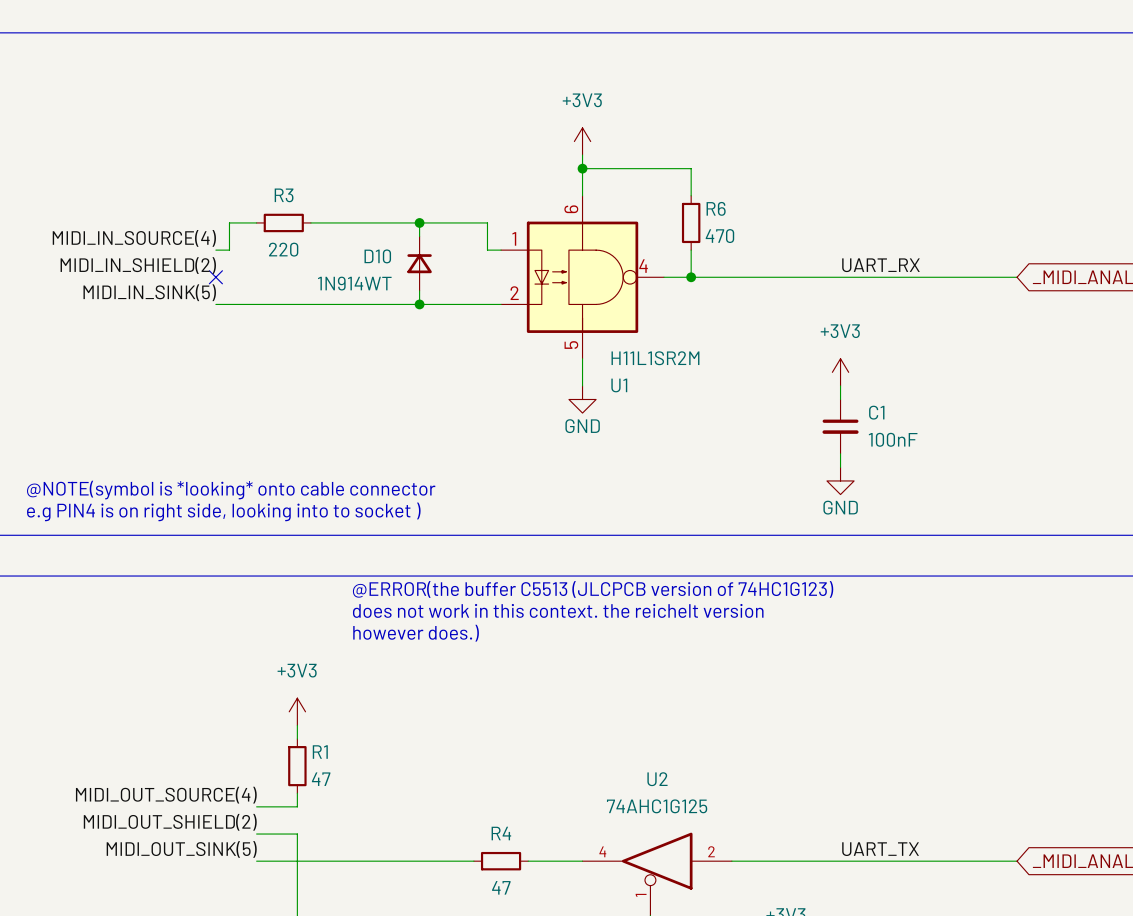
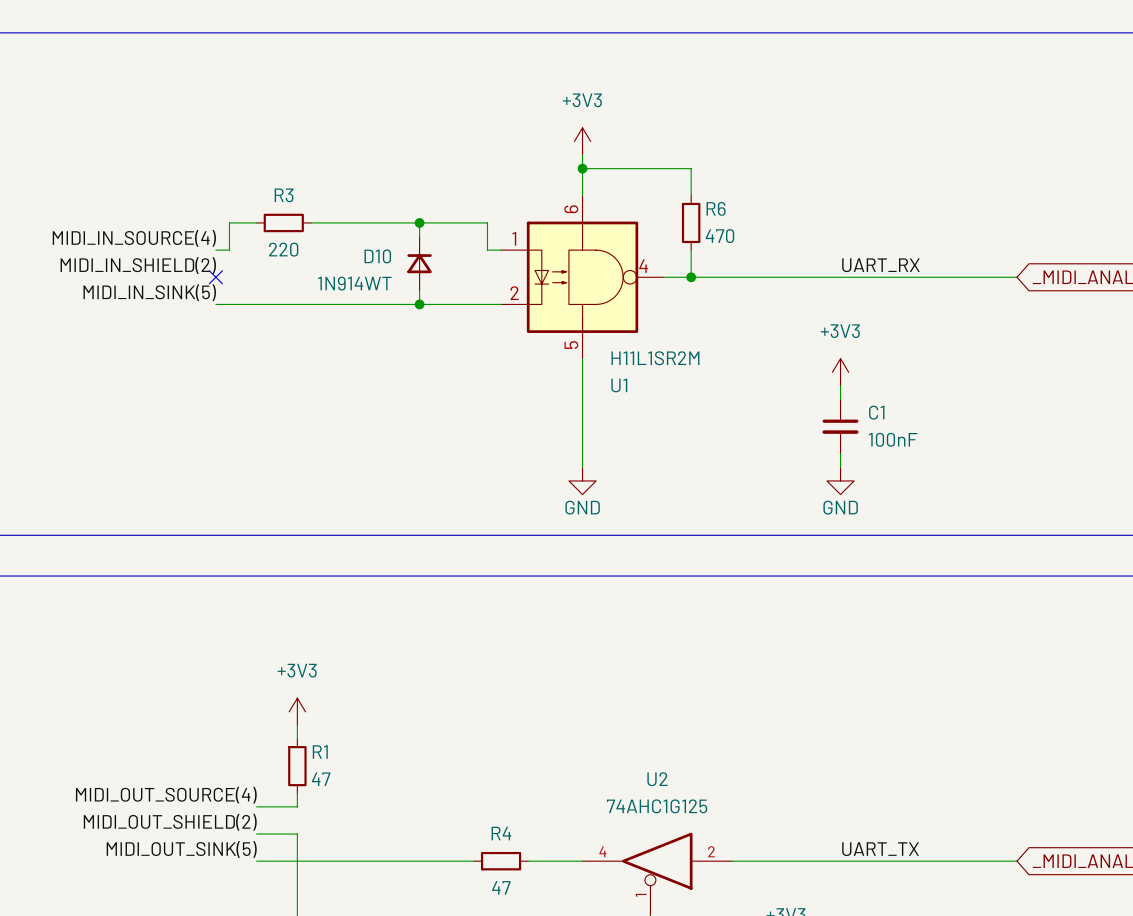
wire: none -> (582, 385) (582, 467)
power symbol position: GND (582, 399) -> GND (582, 480)
text: @NOTE(symbol is *looking* onto cable connector (231, 490) -> none
text: e.g PIN4 is on right side, looking into to socket ) (223, 511) -> none
text: @ERROR(the buffer C5513 (JLCPCB version of 74HC1G123) (593, 589) -> none
text: does not work in this context. the reichelt version (558, 610) -> none
text: however does.) (416, 633) -> none

